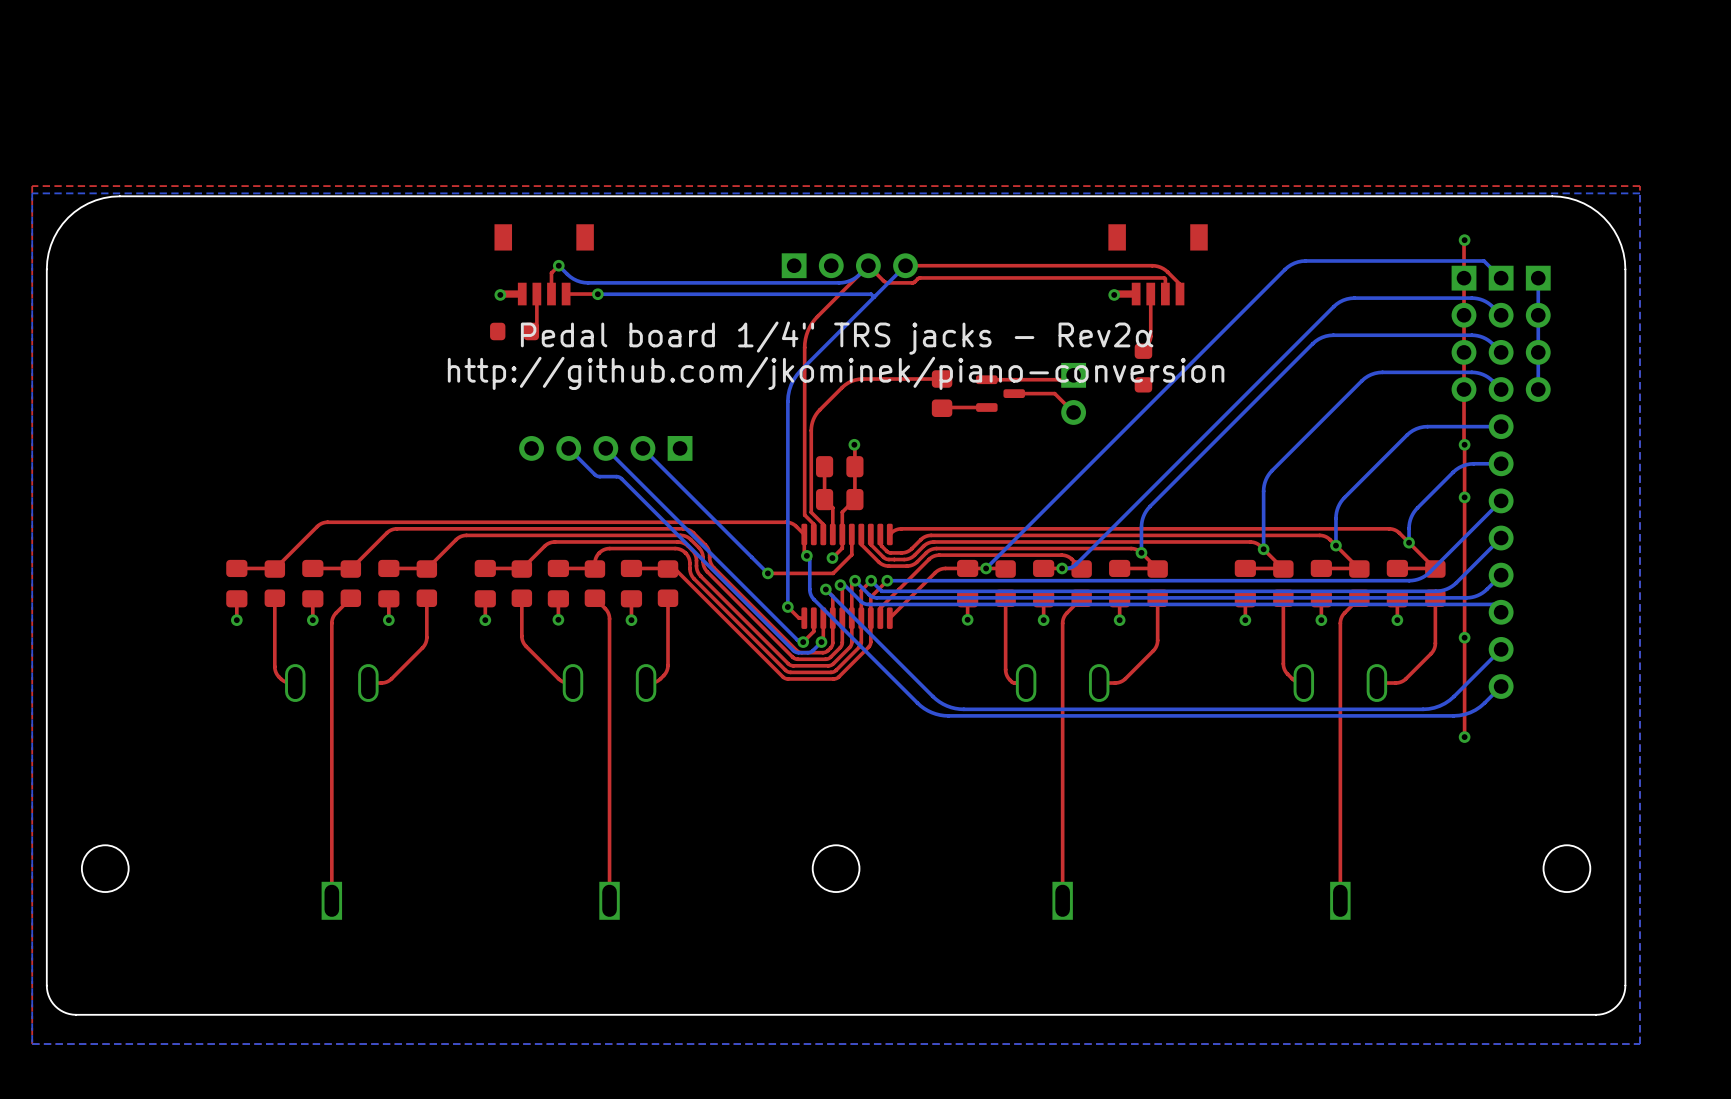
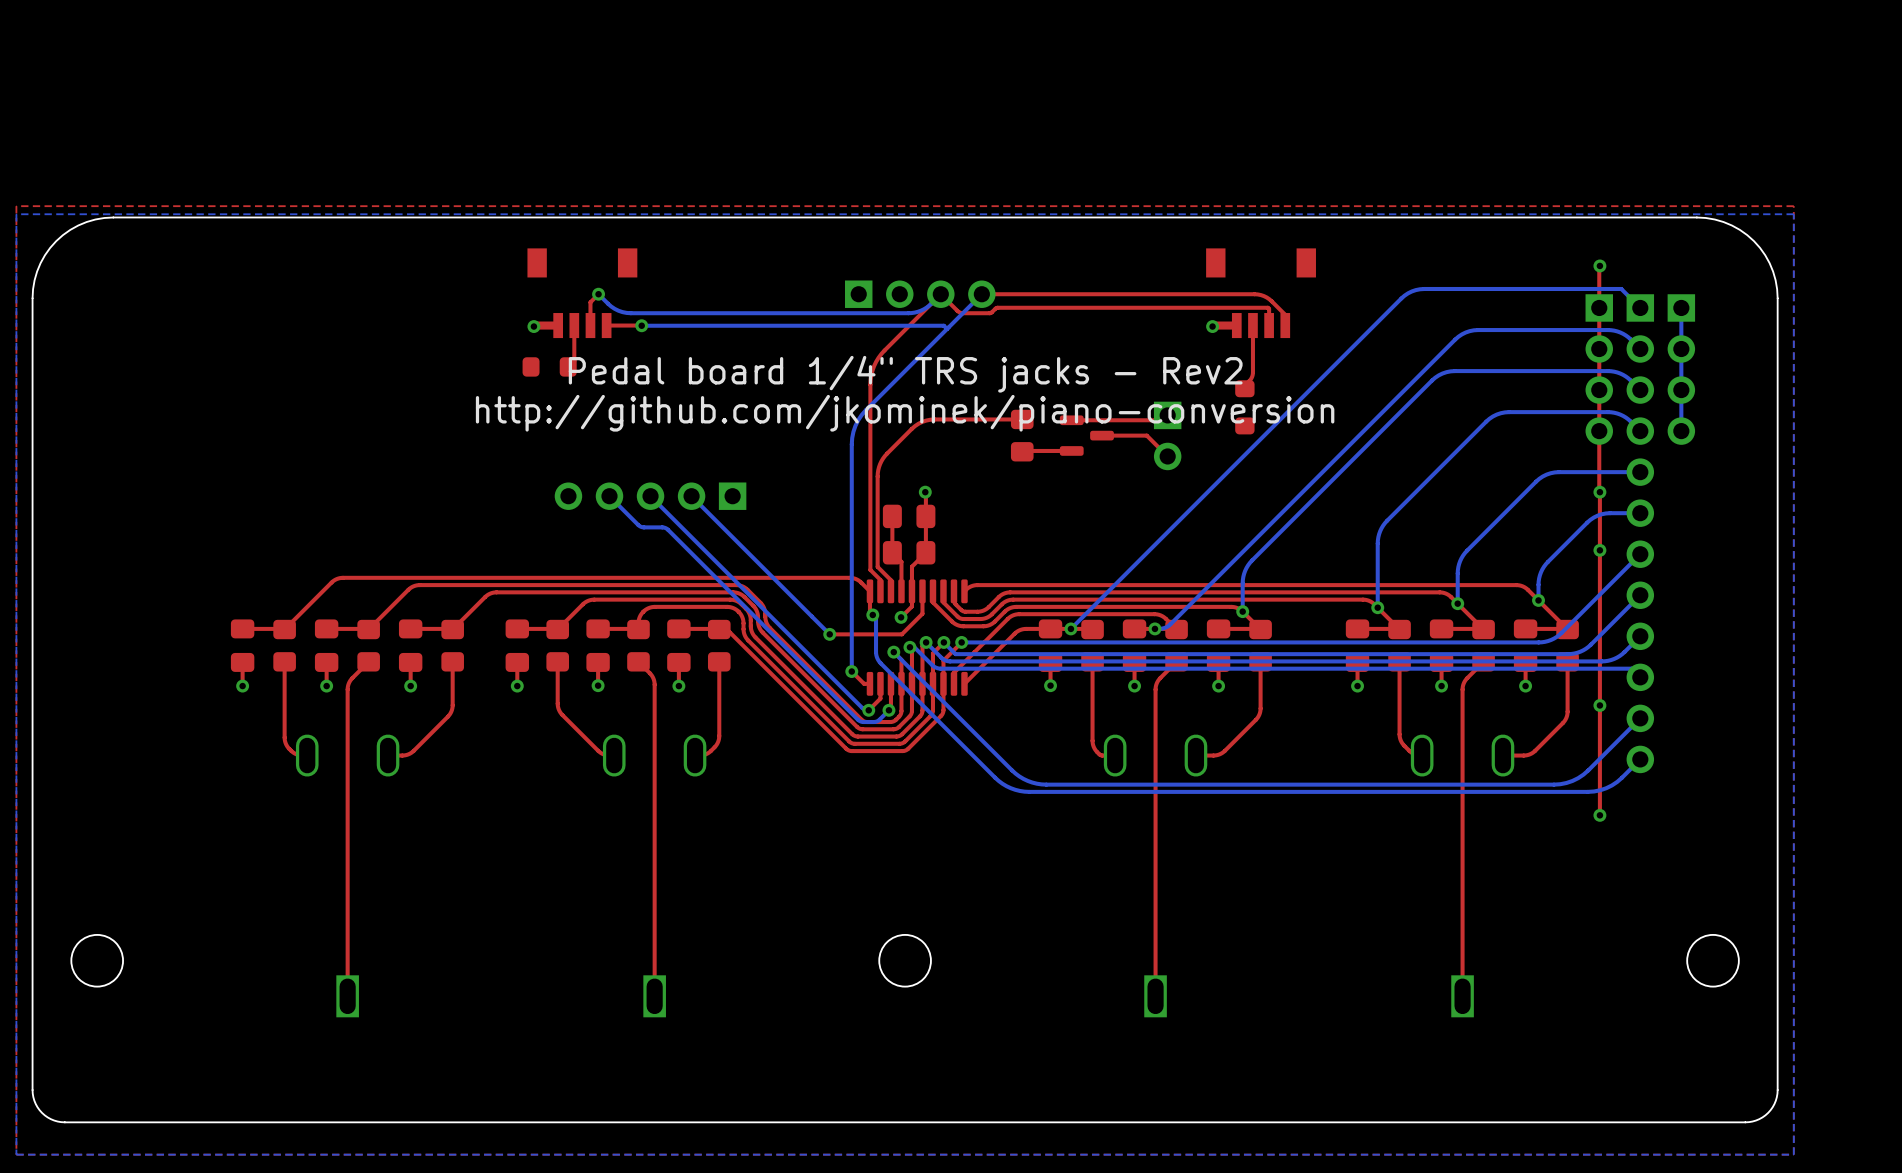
text: Pedal board 1/4" TRS jacks - Rev2α (837, 338) -> Pedal board 1/4" TRS jacks - Rev2 (905, 374)

